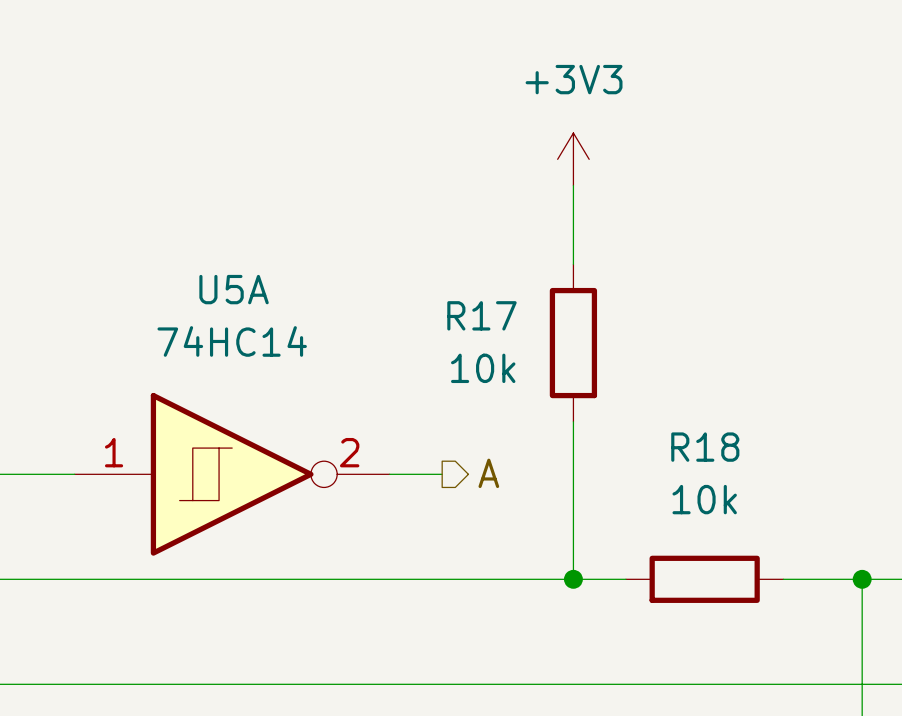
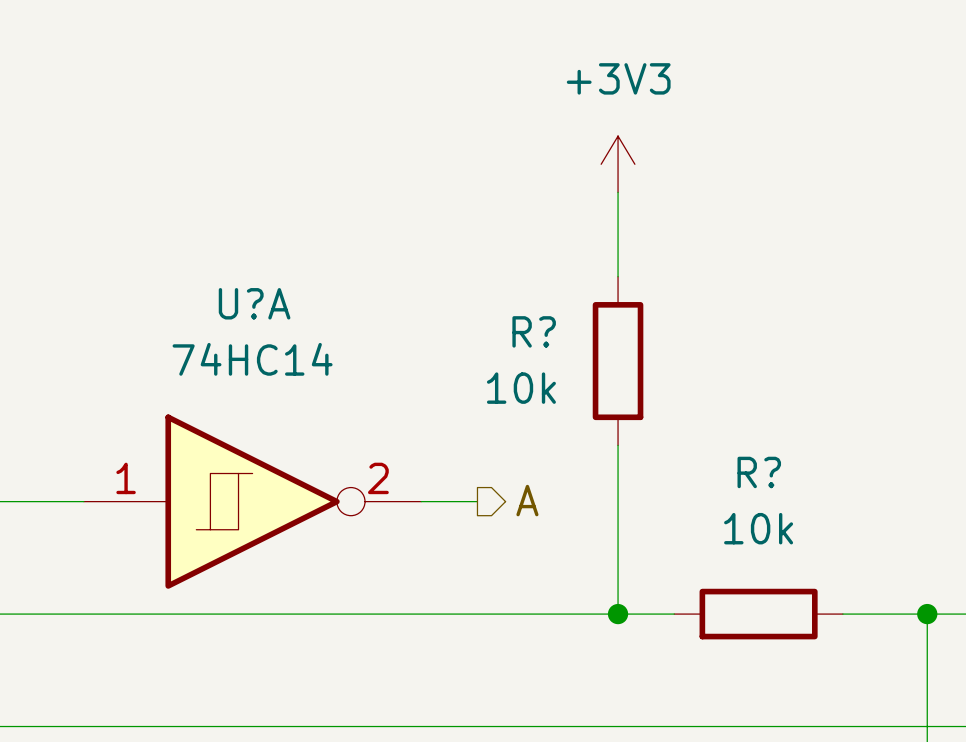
U5A name: U5A (234, 289) -> U?A (254, 303)
R17 name: R17 (481, 315) -> R? (534, 331)
R18 name: R18 (705, 447) -> R? (759, 472)

